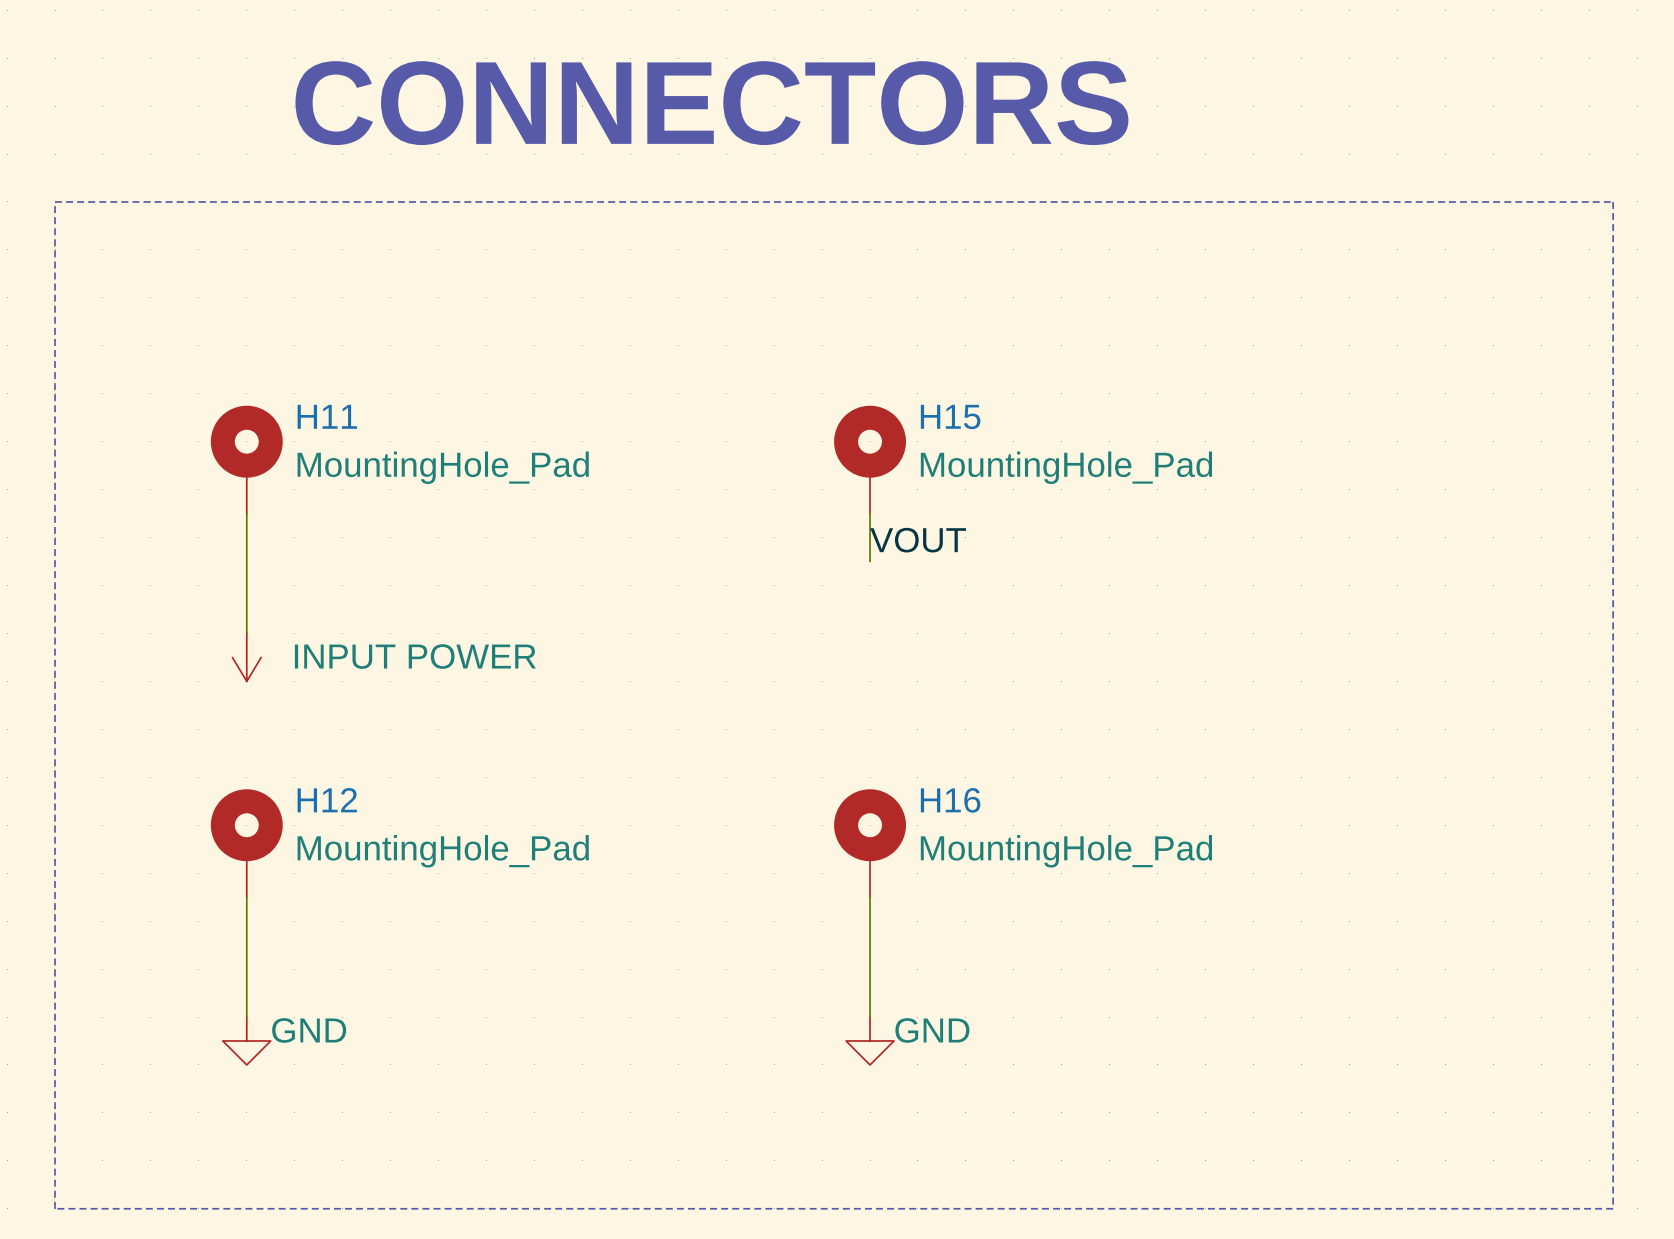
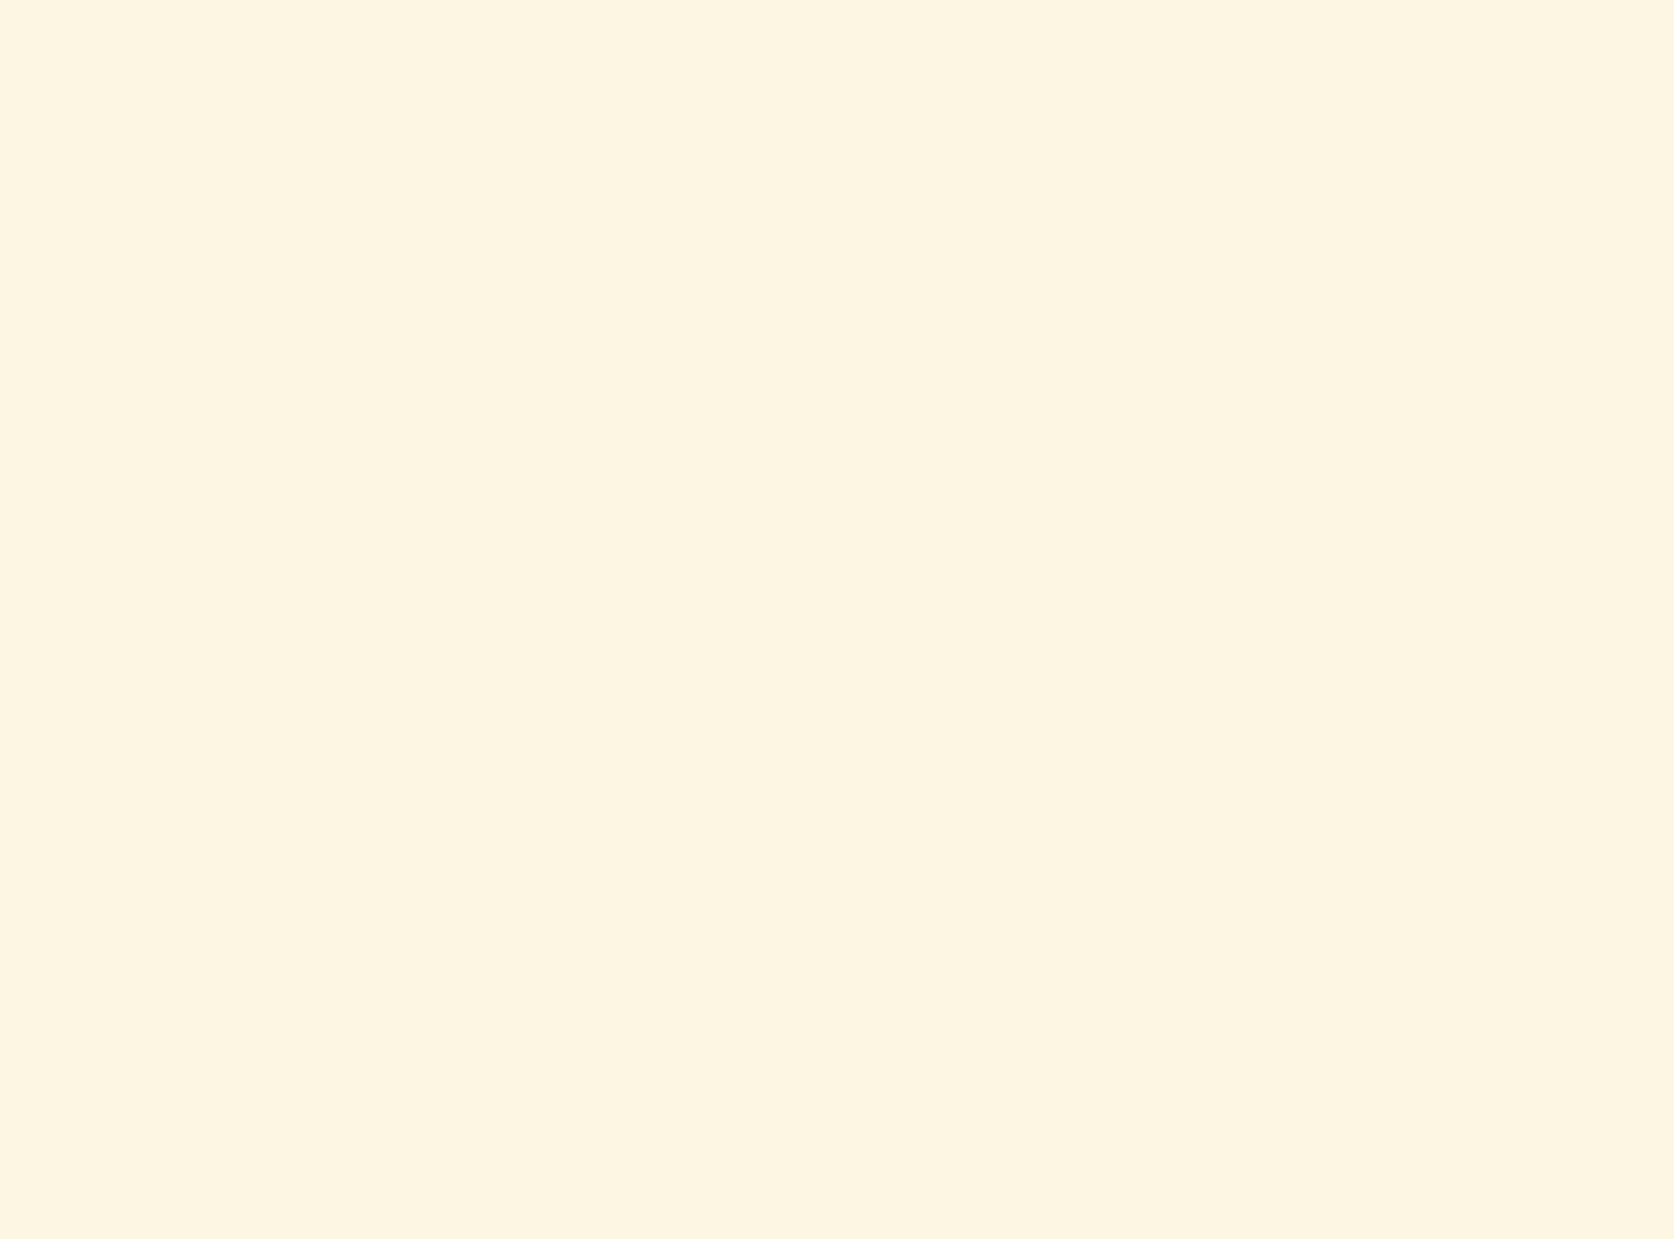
text: CONNECTORS (711, 103) -> none
line: (55, 201) (1613, 201) (1613, 1208) (55, 1208) (55, 201) -> none
H11: MountingHole_Pad (246, 459) -> none
H15: MountingHole_Pad (870, 459) -> none
wire: (246, 513) (246, 633) -> none
wire: (870, 513) (870, 561) -> none
label: VOUT (918, 540) -> none
power symbol: INPUT POWER (246, 657) -> none
H12: MountingHole_Pad (246, 843) -> none
H16: MountingHole_Pad (870, 843) -> none
wire: (246, 897) (246, 1017) -> none
wire: (870, 897) (870, 1017) -> none
power symbol: GND (246, 1040) -> none
power symbol: GND (870, 1040) -> none

